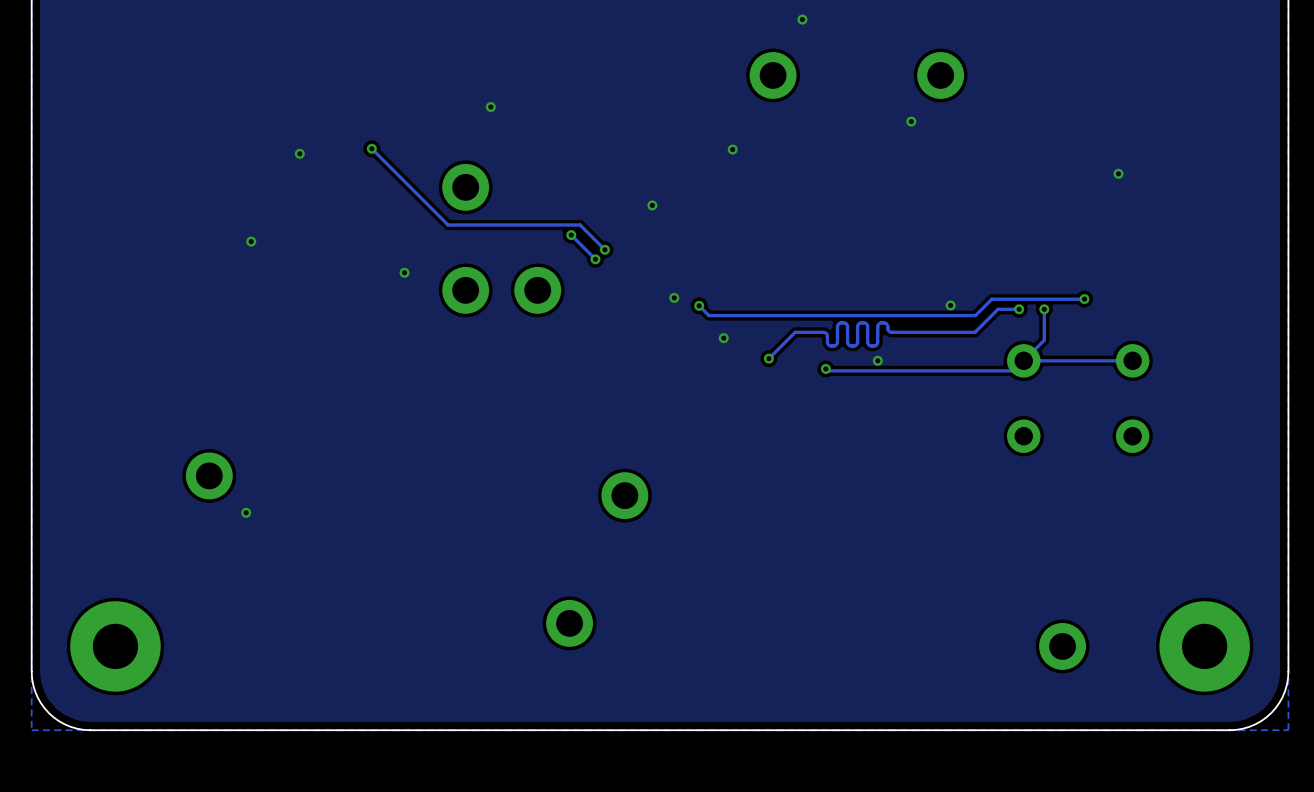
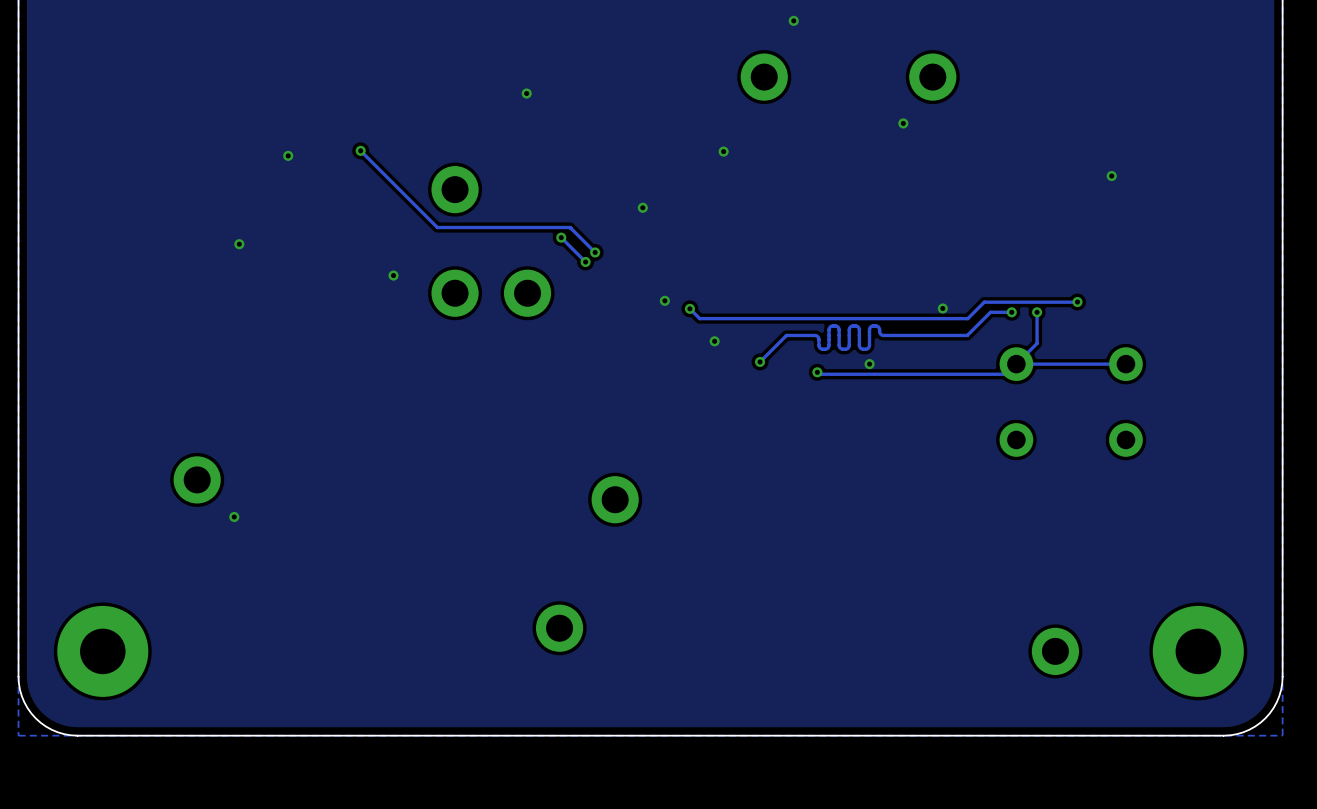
via position: (490, 107) -> (526, 93)

